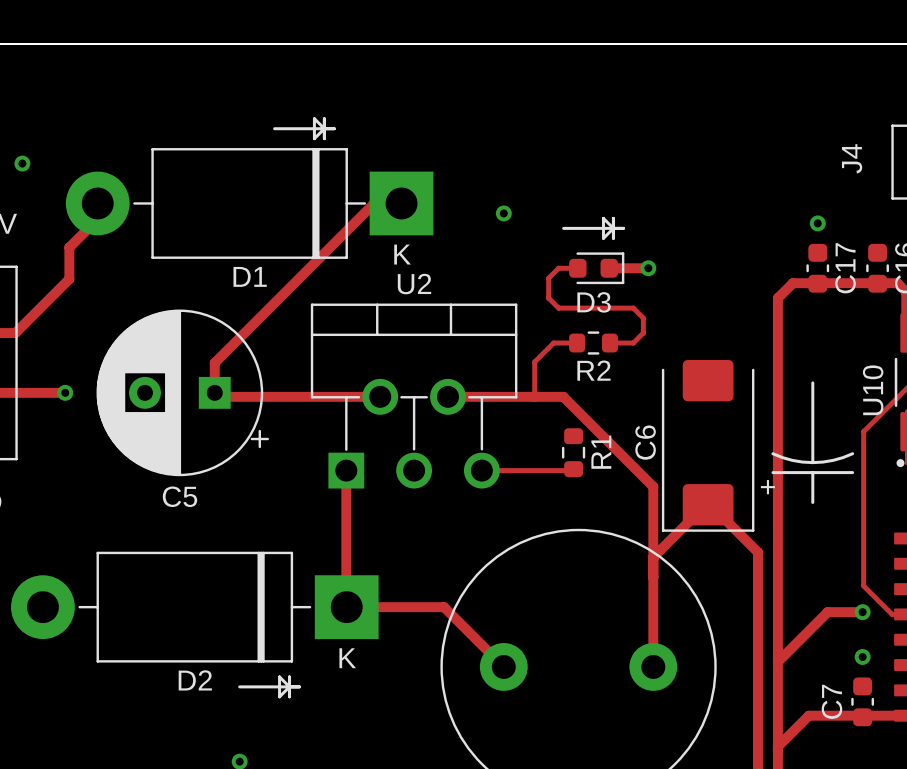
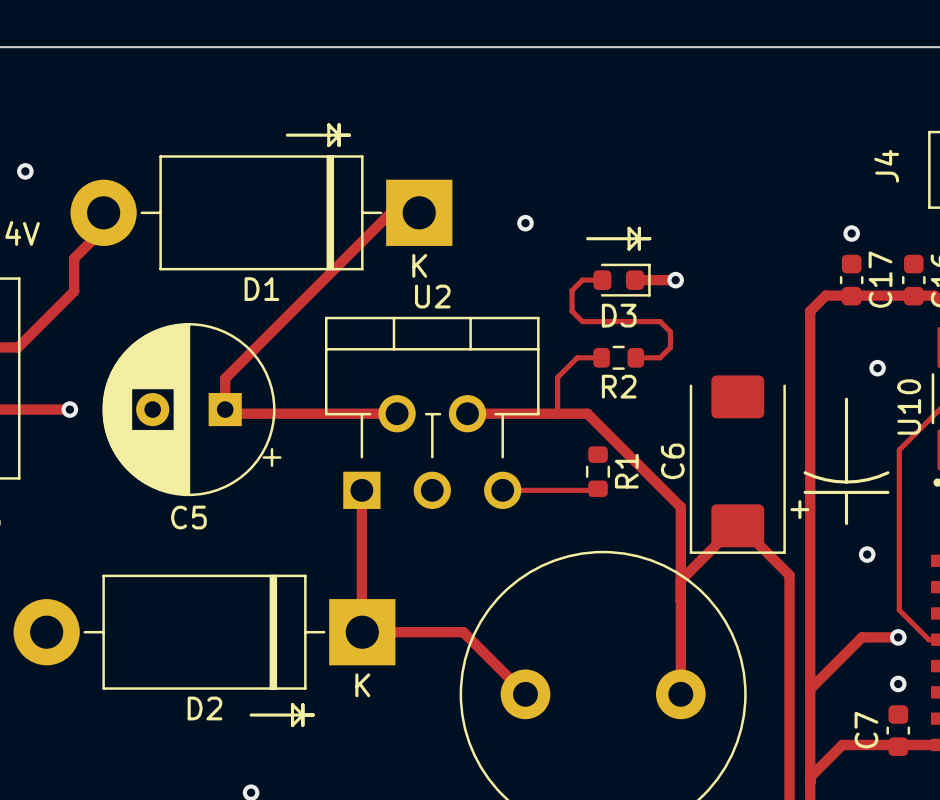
U2 footprint: [310, 303, 518, 489] -> [325, 316, 540, 509]
via: none -> (877, 368)
via: none -> (867, 554)

